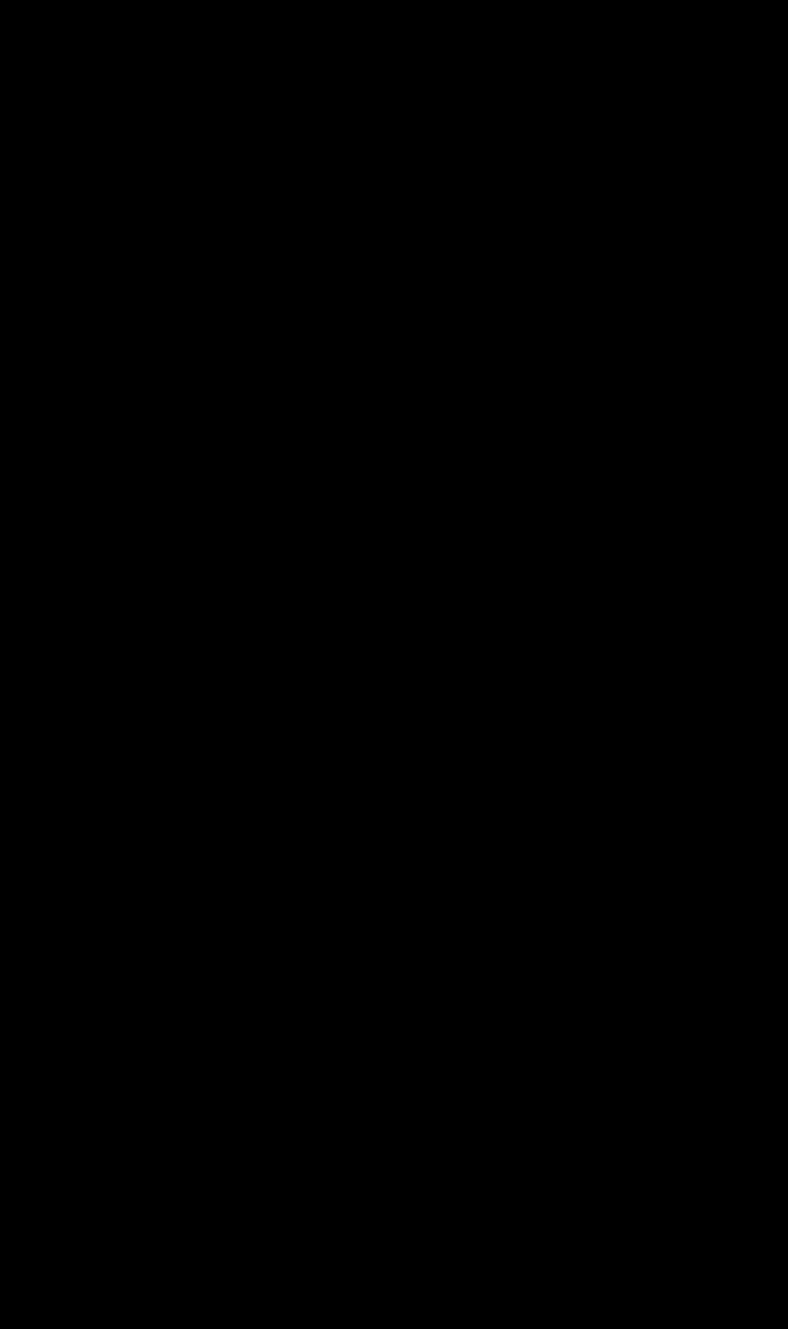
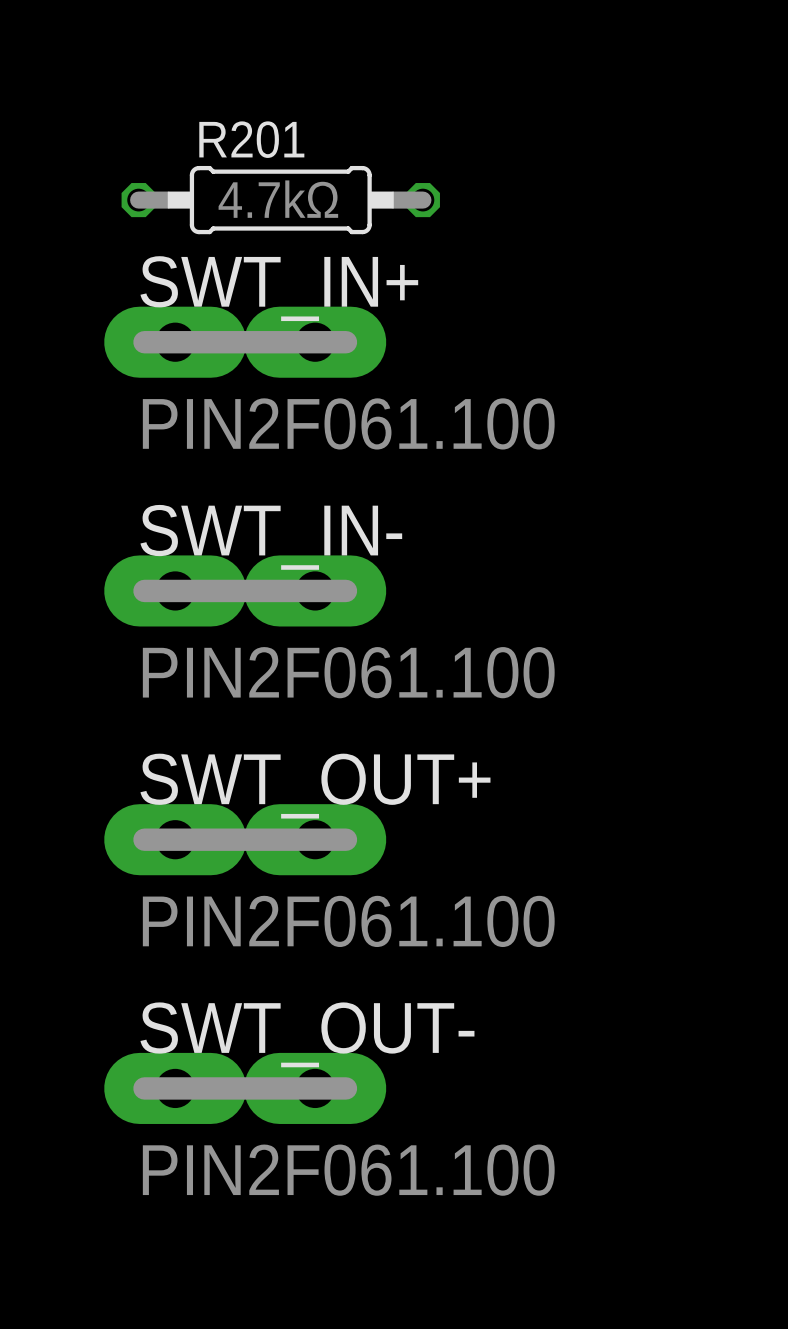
R201: none -> 4.7kΩ (280, 200)
SWT_IN+: none -> PIN2F061.100 (245, 342)
SWT_IN-: none -> PIN2F061.100 (245, 590)
SWT_OUT+: none -> PIN2F061.100 (245, 839)
SWT_OUT-: none -> PIN2F061.100 (245, 1088)

